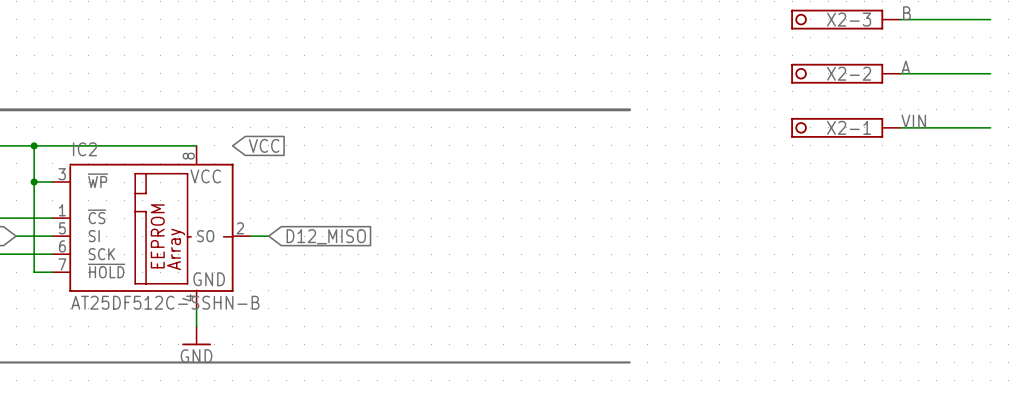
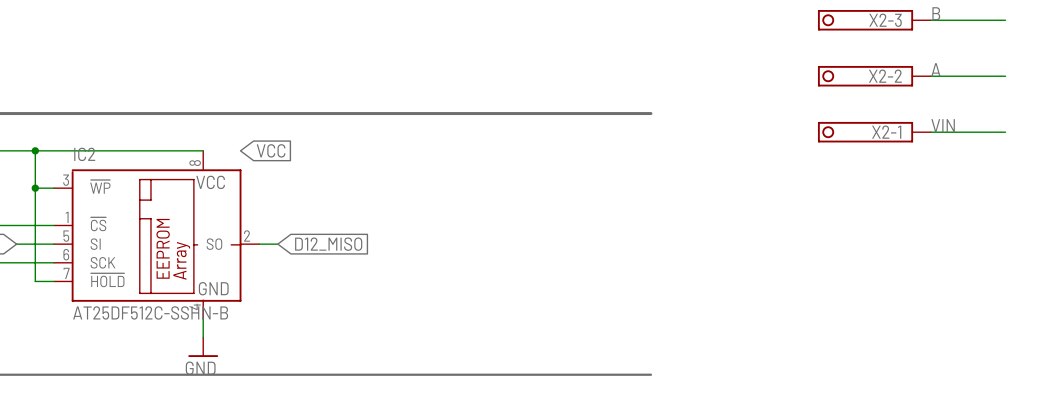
wire: (972, 19) (990, 19) -> none
wire: (972, 73) (990, 73) -> none
wire: (972, 127) (990, 127) -> none

